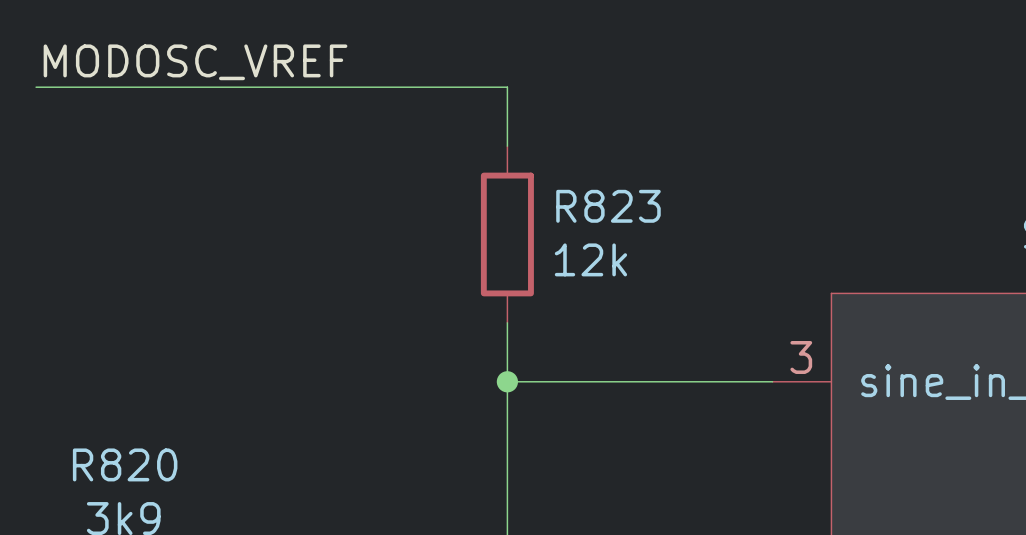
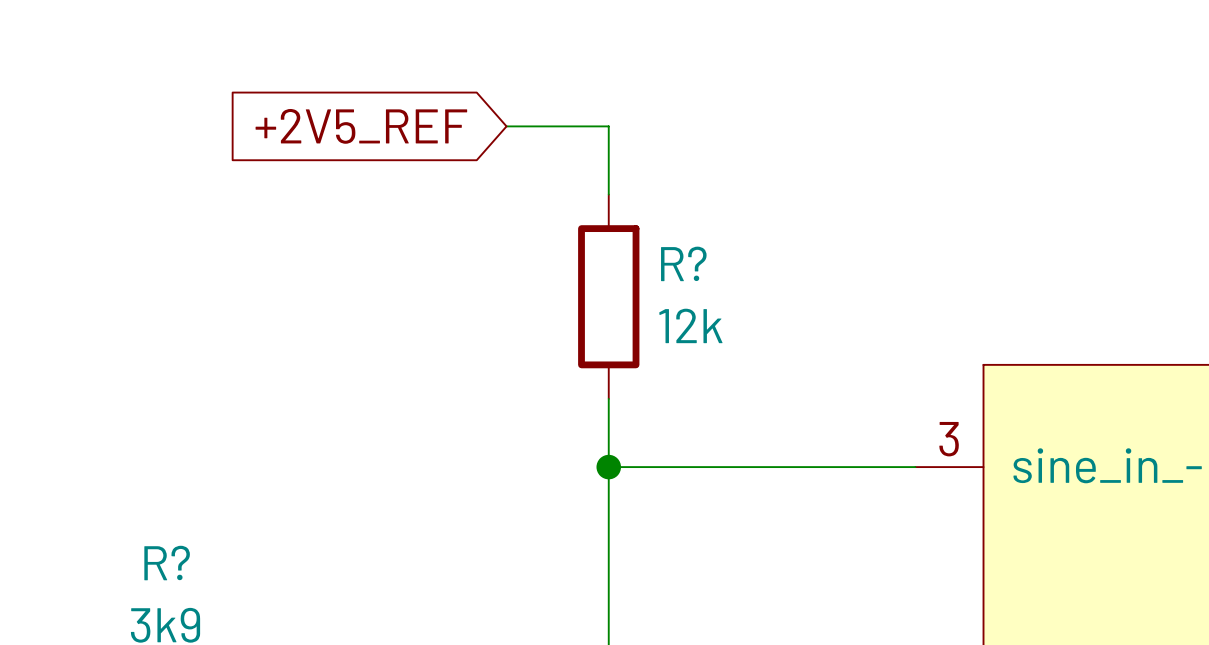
label: MODOSC_VREF (195, 62) -> none
wire: (36, 87) (419, 87) -> none
global label: none -> +2V5_REF (361, 126)
R823 name: R823 (608, 206) -> R? (683, 263)
R820 name: R820 (125, 464) -> R? (167, 563)

